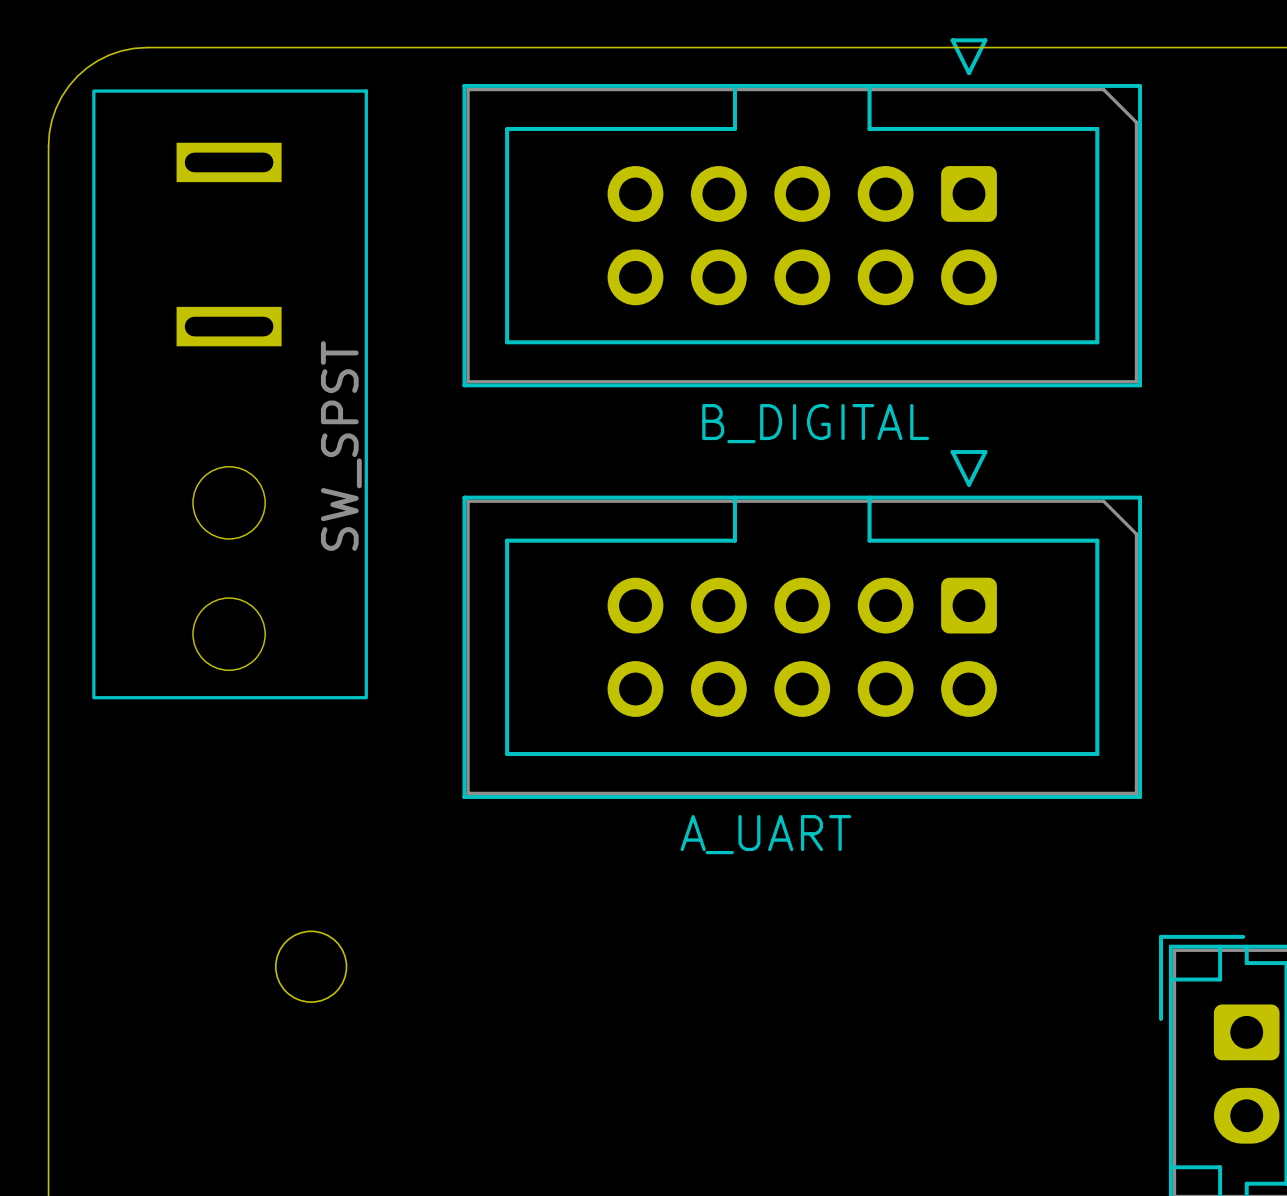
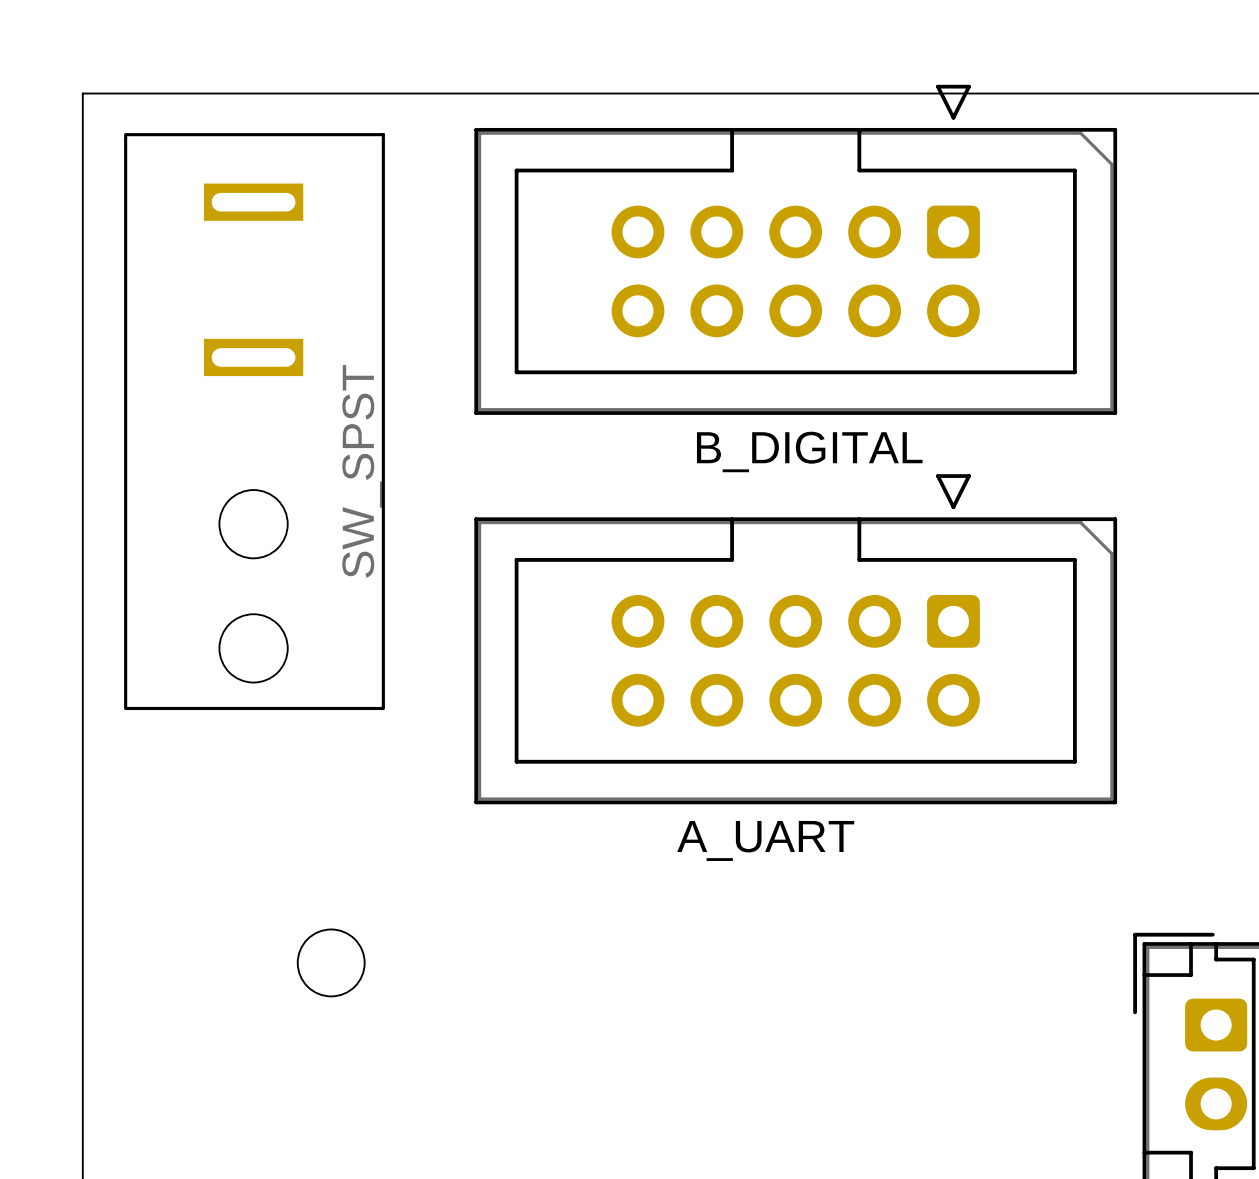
board edge: (147, 47) (121, 50) (109, 55) (87, 67) (77, 76) (68, 86) (56, 108) (51, 120) (48, 146) -> (175, 93) (82, 93) (82, 186)

